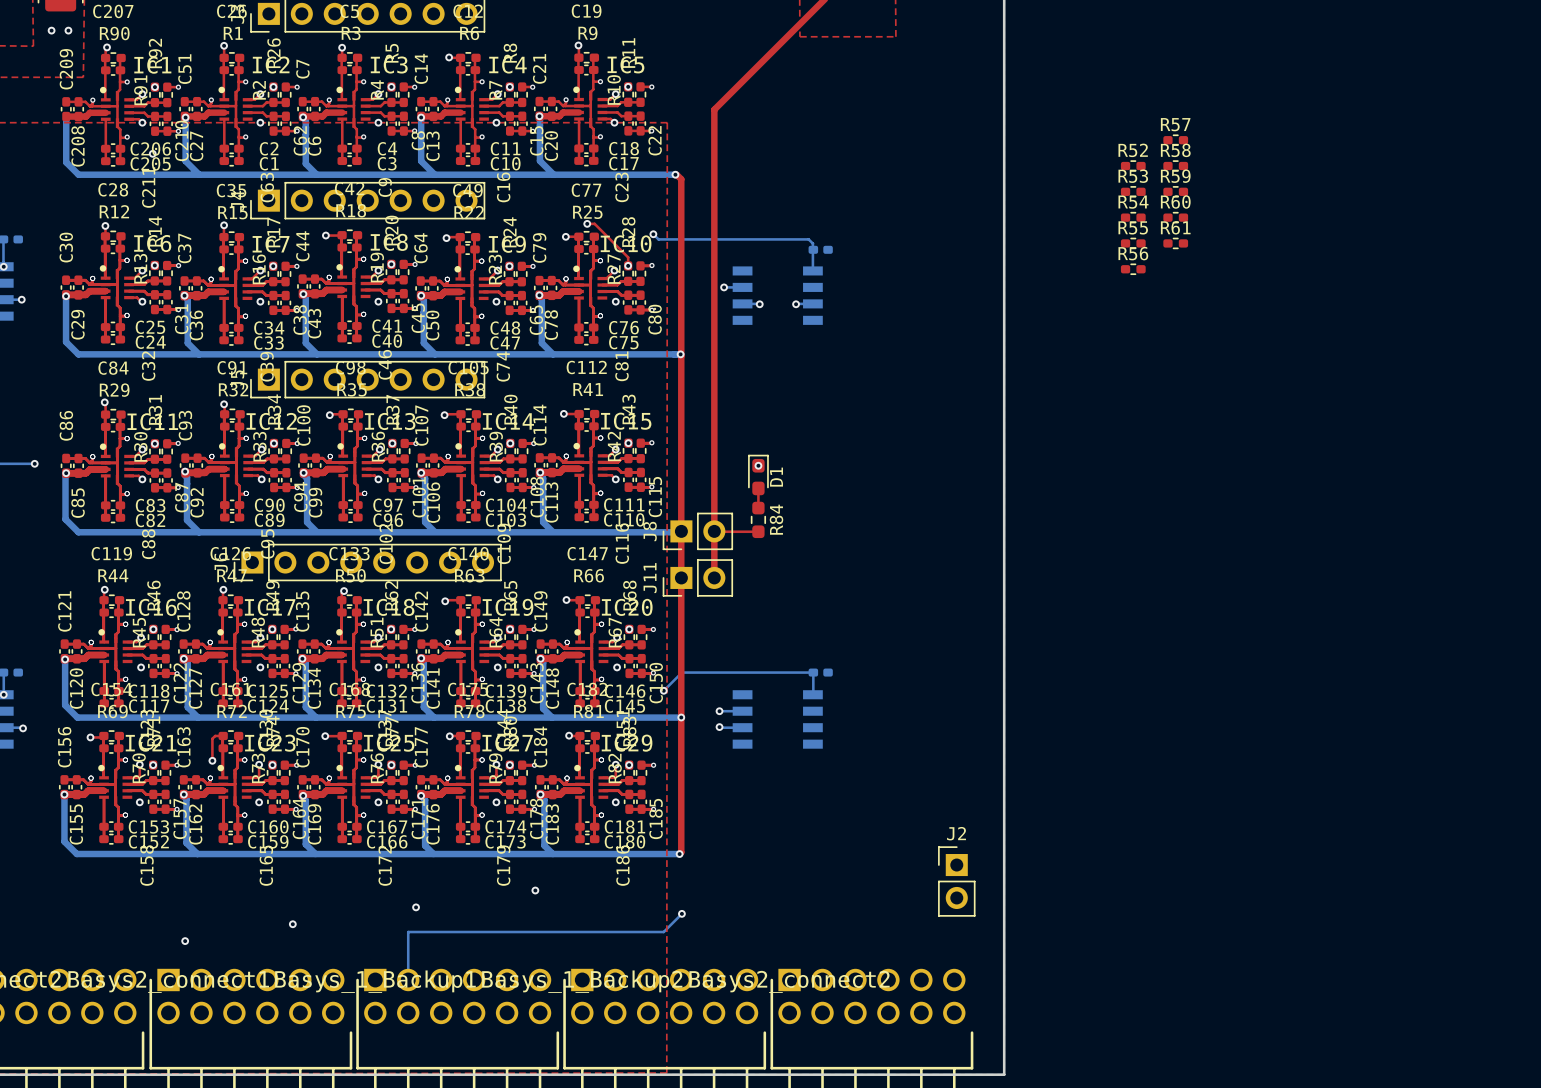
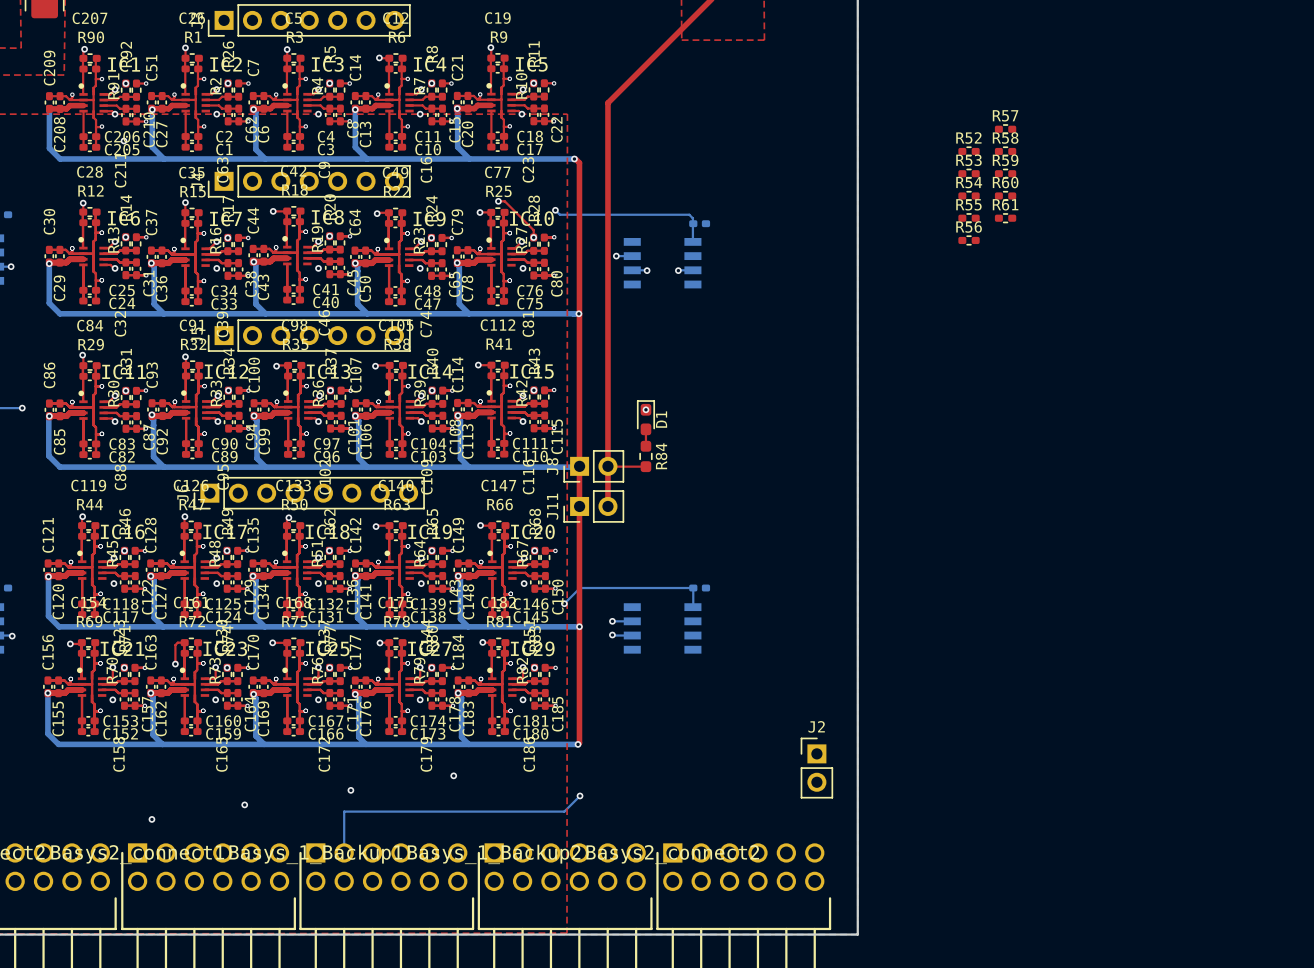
via: (51, 30) -> none
via: (68, 30) -> none

